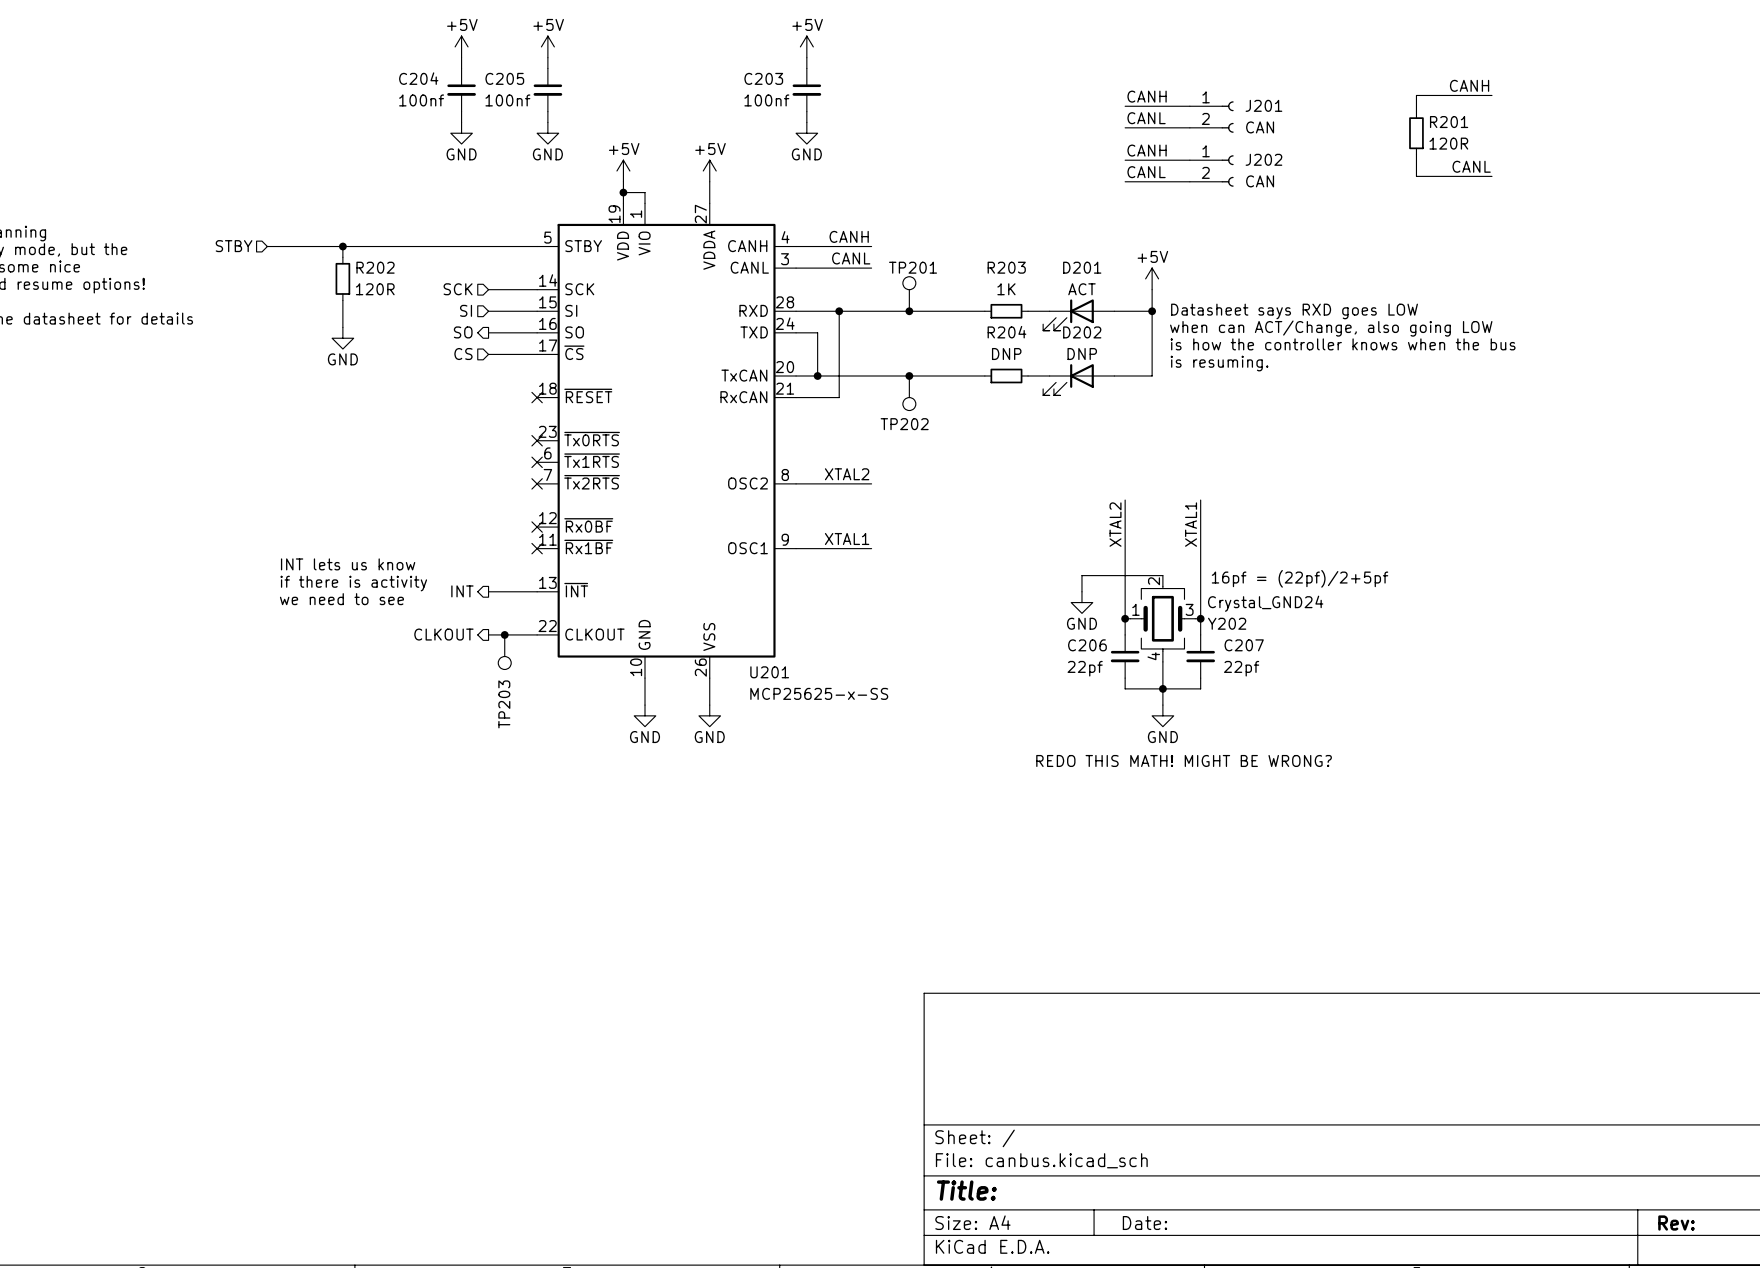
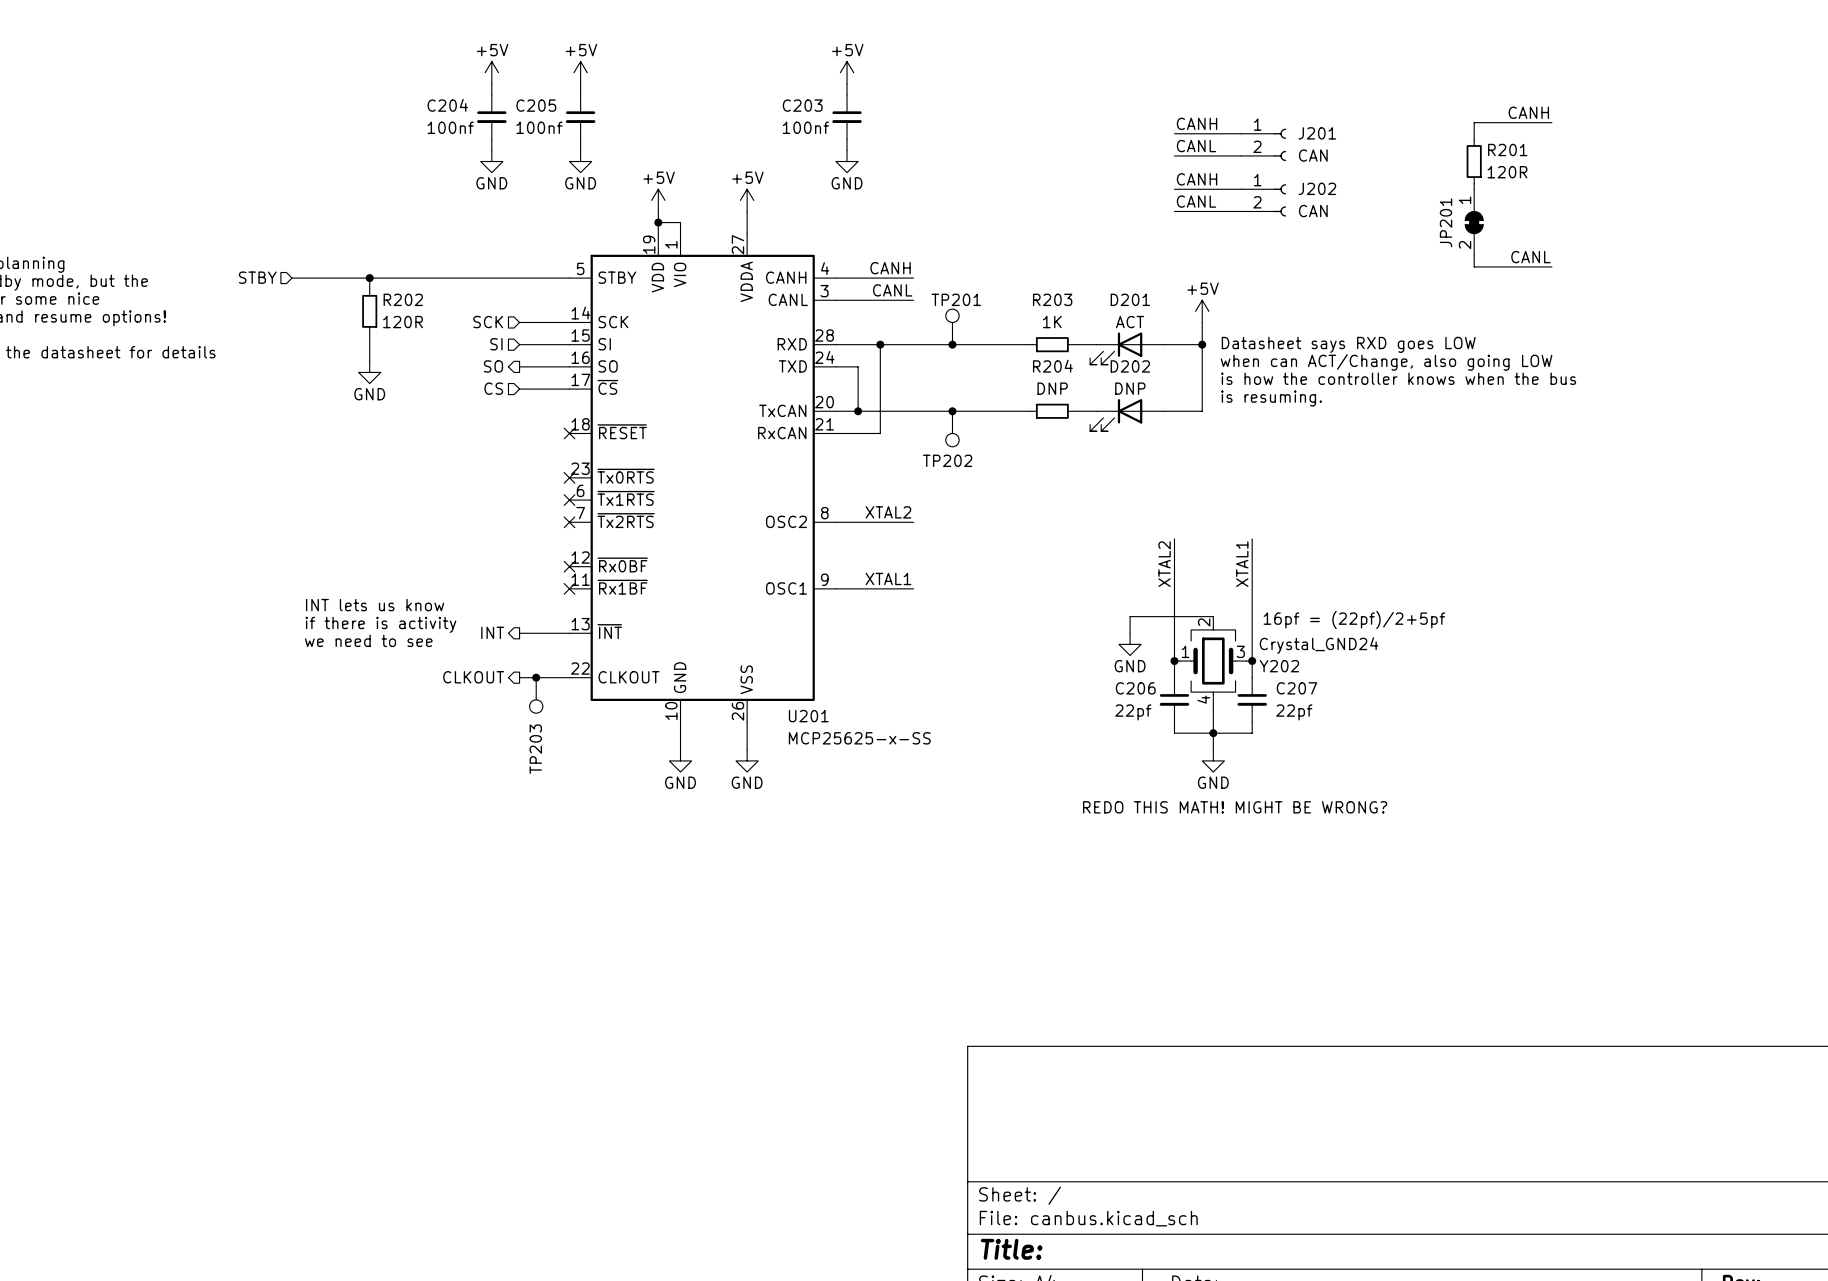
wire: (1416, 160) (1416, 176) (1491, 176) -> none
label position: CANL (1471, 166) -> CANL (1530, 257)
JP201: none -> (1474, 222)
wire: none -> (1474, 255) (1474, 266) (1551, 266)

